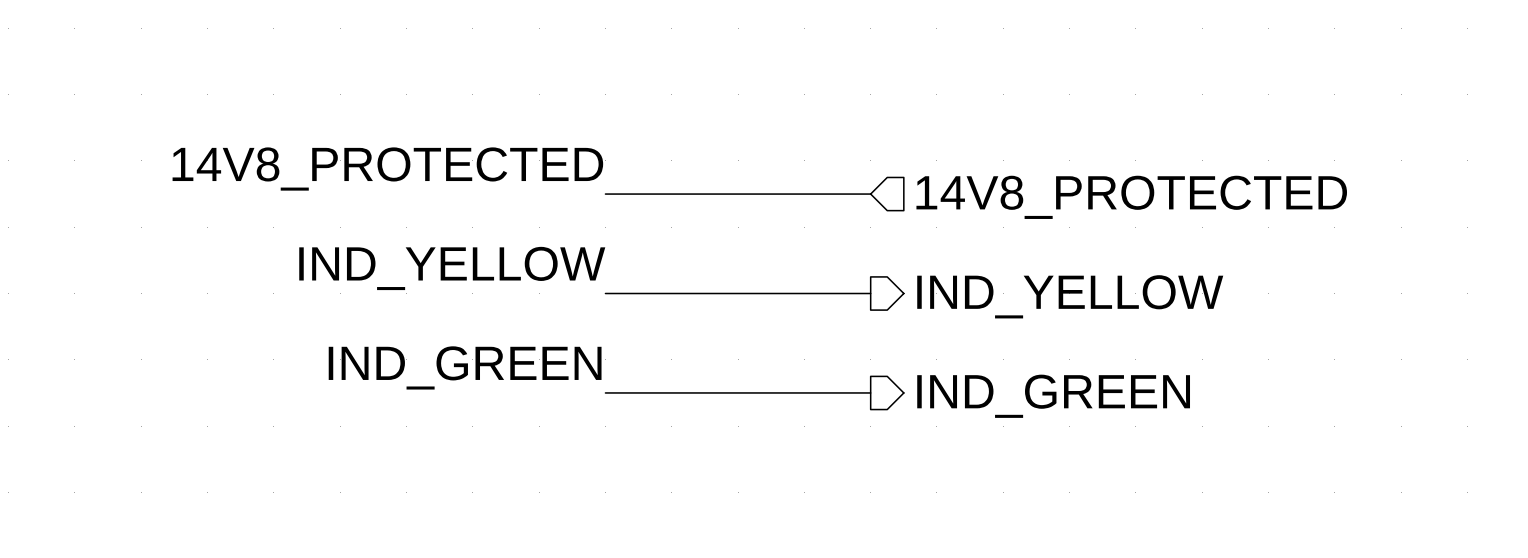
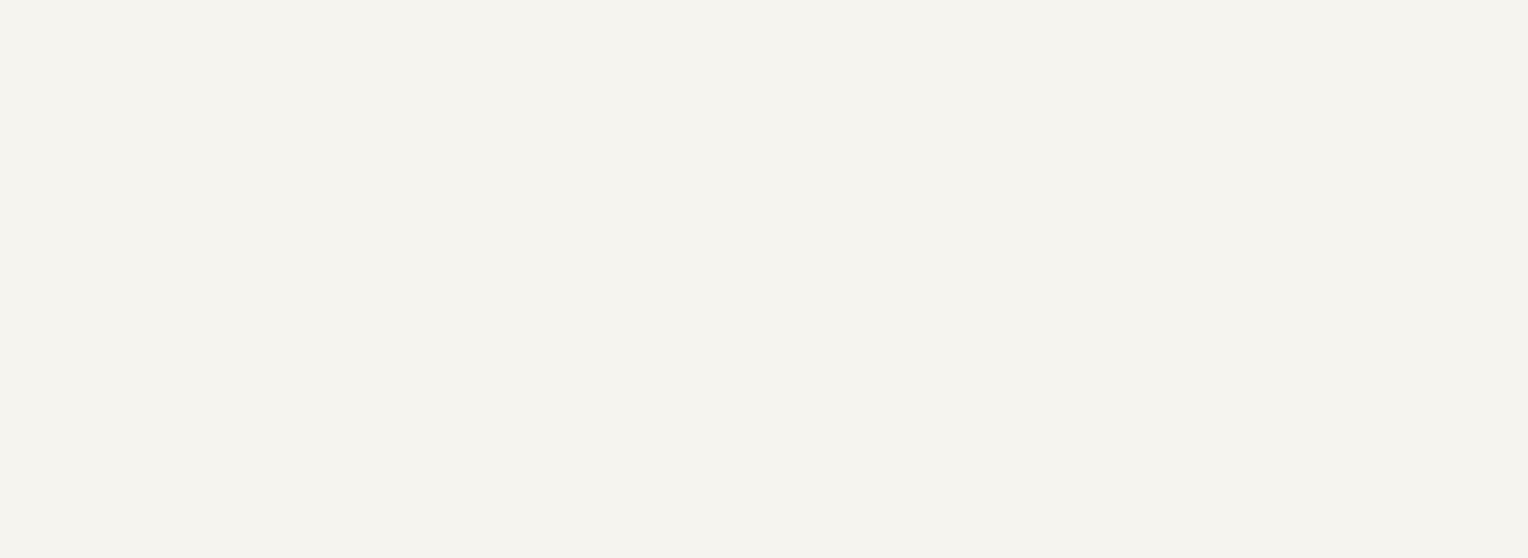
label: 14V8_PROTECTED (387, 169) -> none
wire: (605, 194) (870, 194) -> none
hierarchical label: 14V8_PROTECTED (1131, 197) -> none
label: IND_YELLOW (452, 268) -> none
wire: (605, 293) (870, 293) -> none
hierarchical label: IND_YELLOW (1070, 296) -> none
label: IND_GREEN (465, 367) -> none
wire: (605, 392) (870, 392) -> none
hierarchical label: IND_GREEN (1053, 396) -> none

